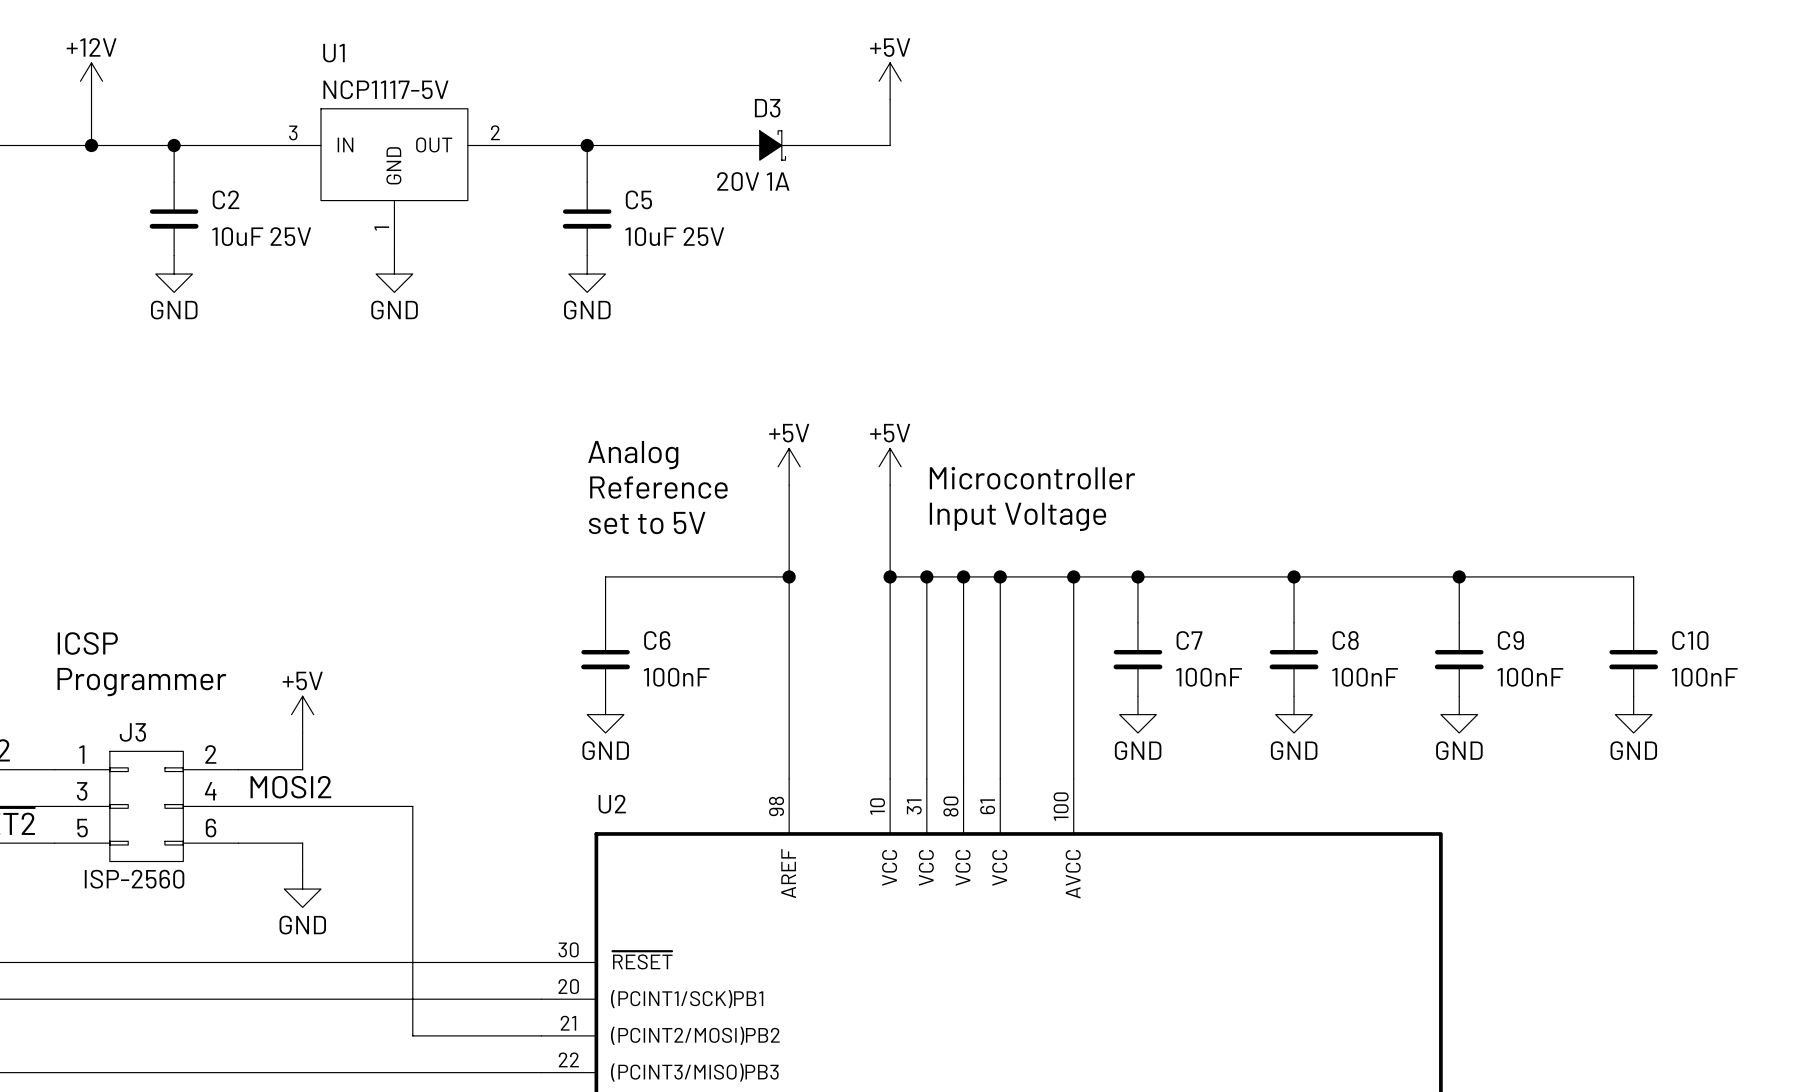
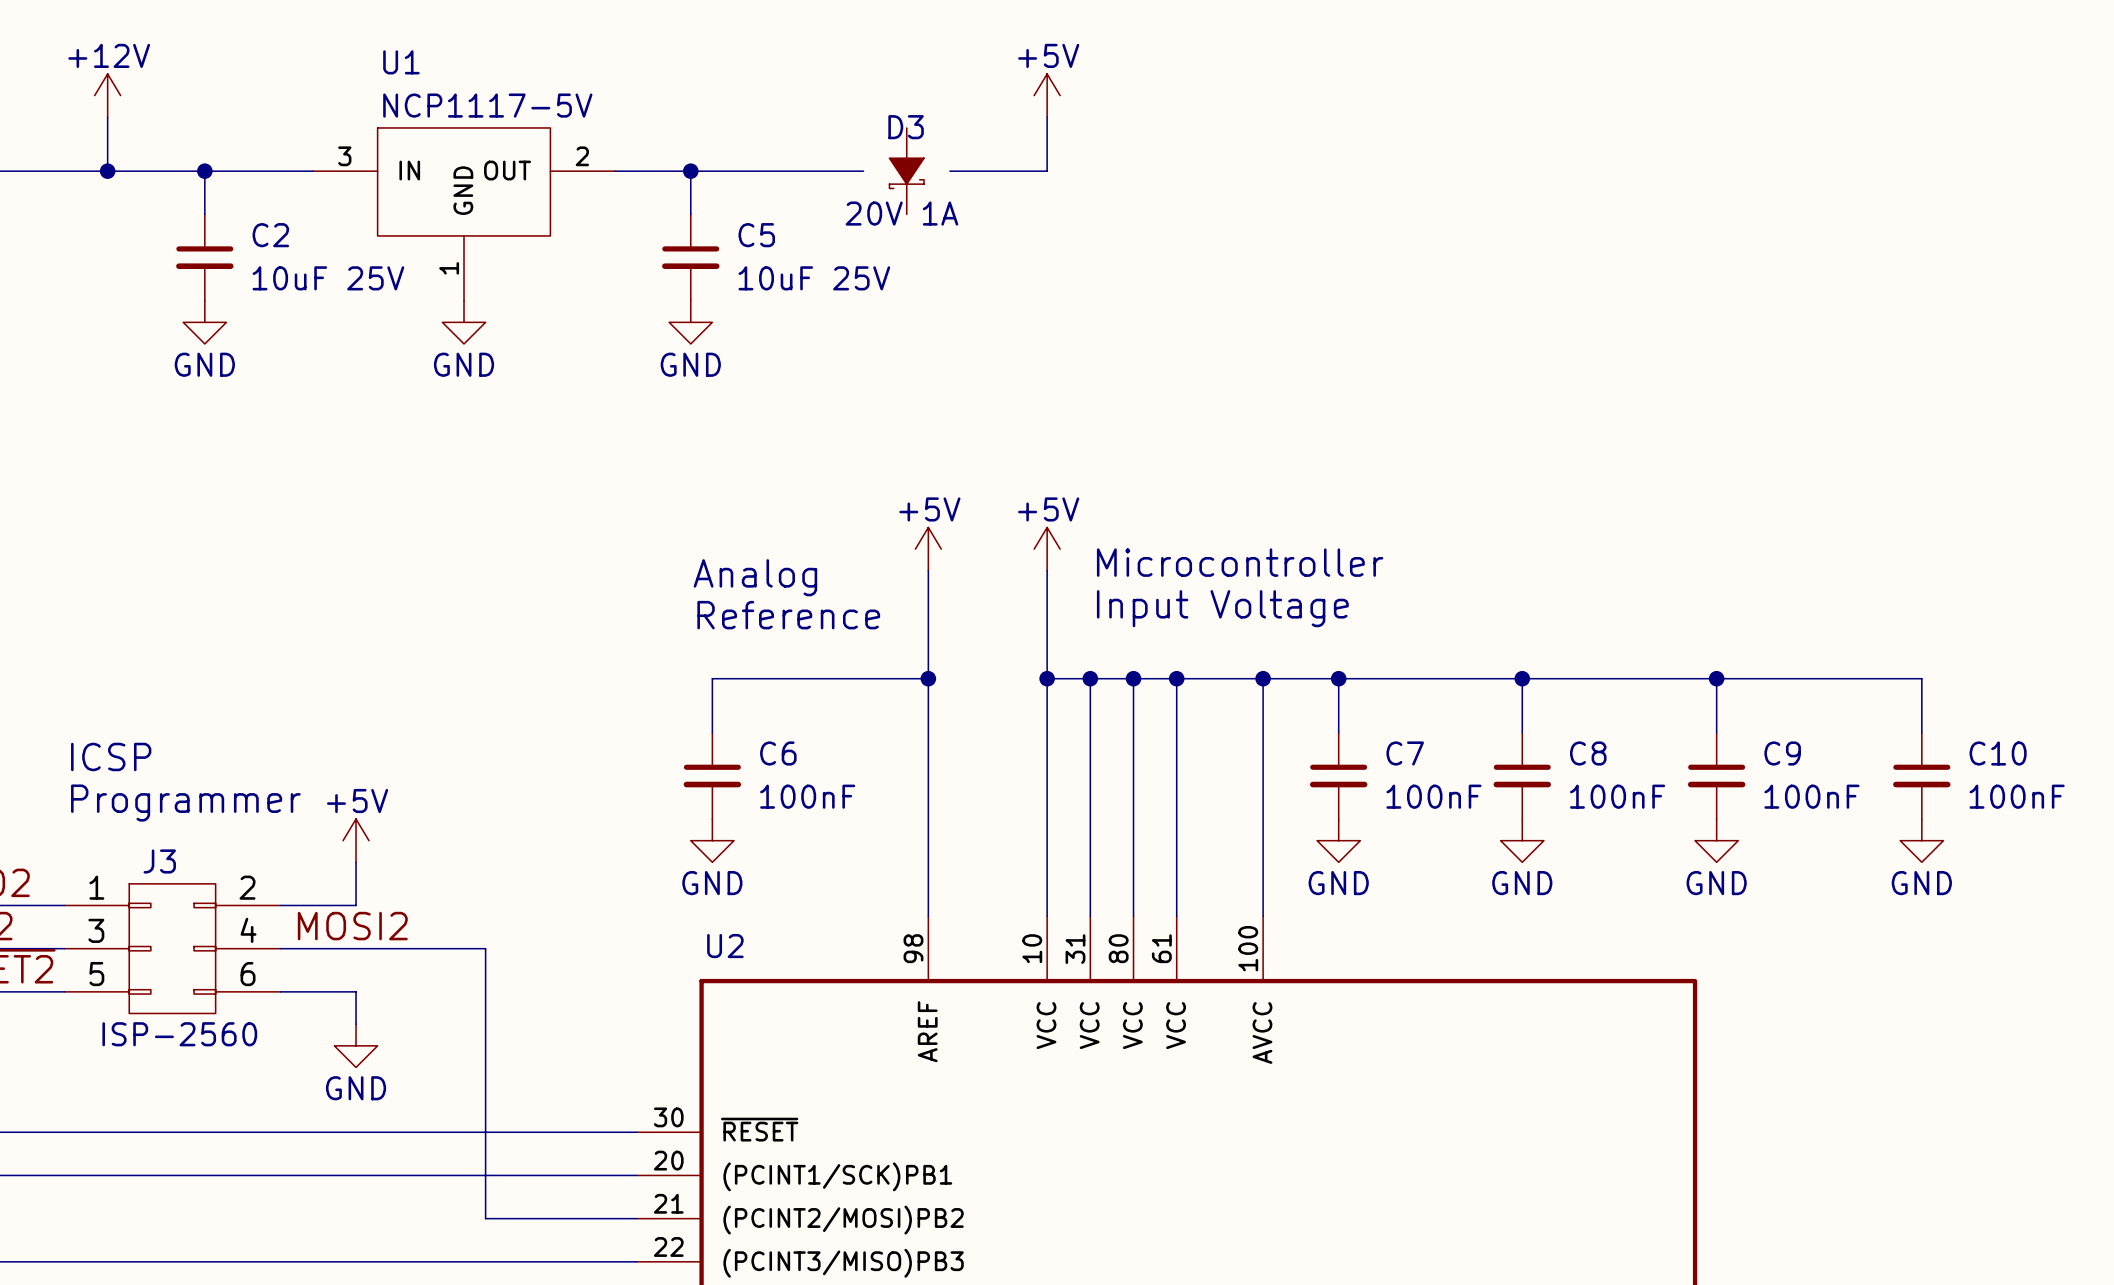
D3 rotation: 0° (772, 145) -> 90° clockwise (906, 173)
text: Analog (633, 455) -> none
text: Reference (658, 487) -> Analog (755, 577)
text: set to 5V (647, 523) -> Reference (788, 615)

